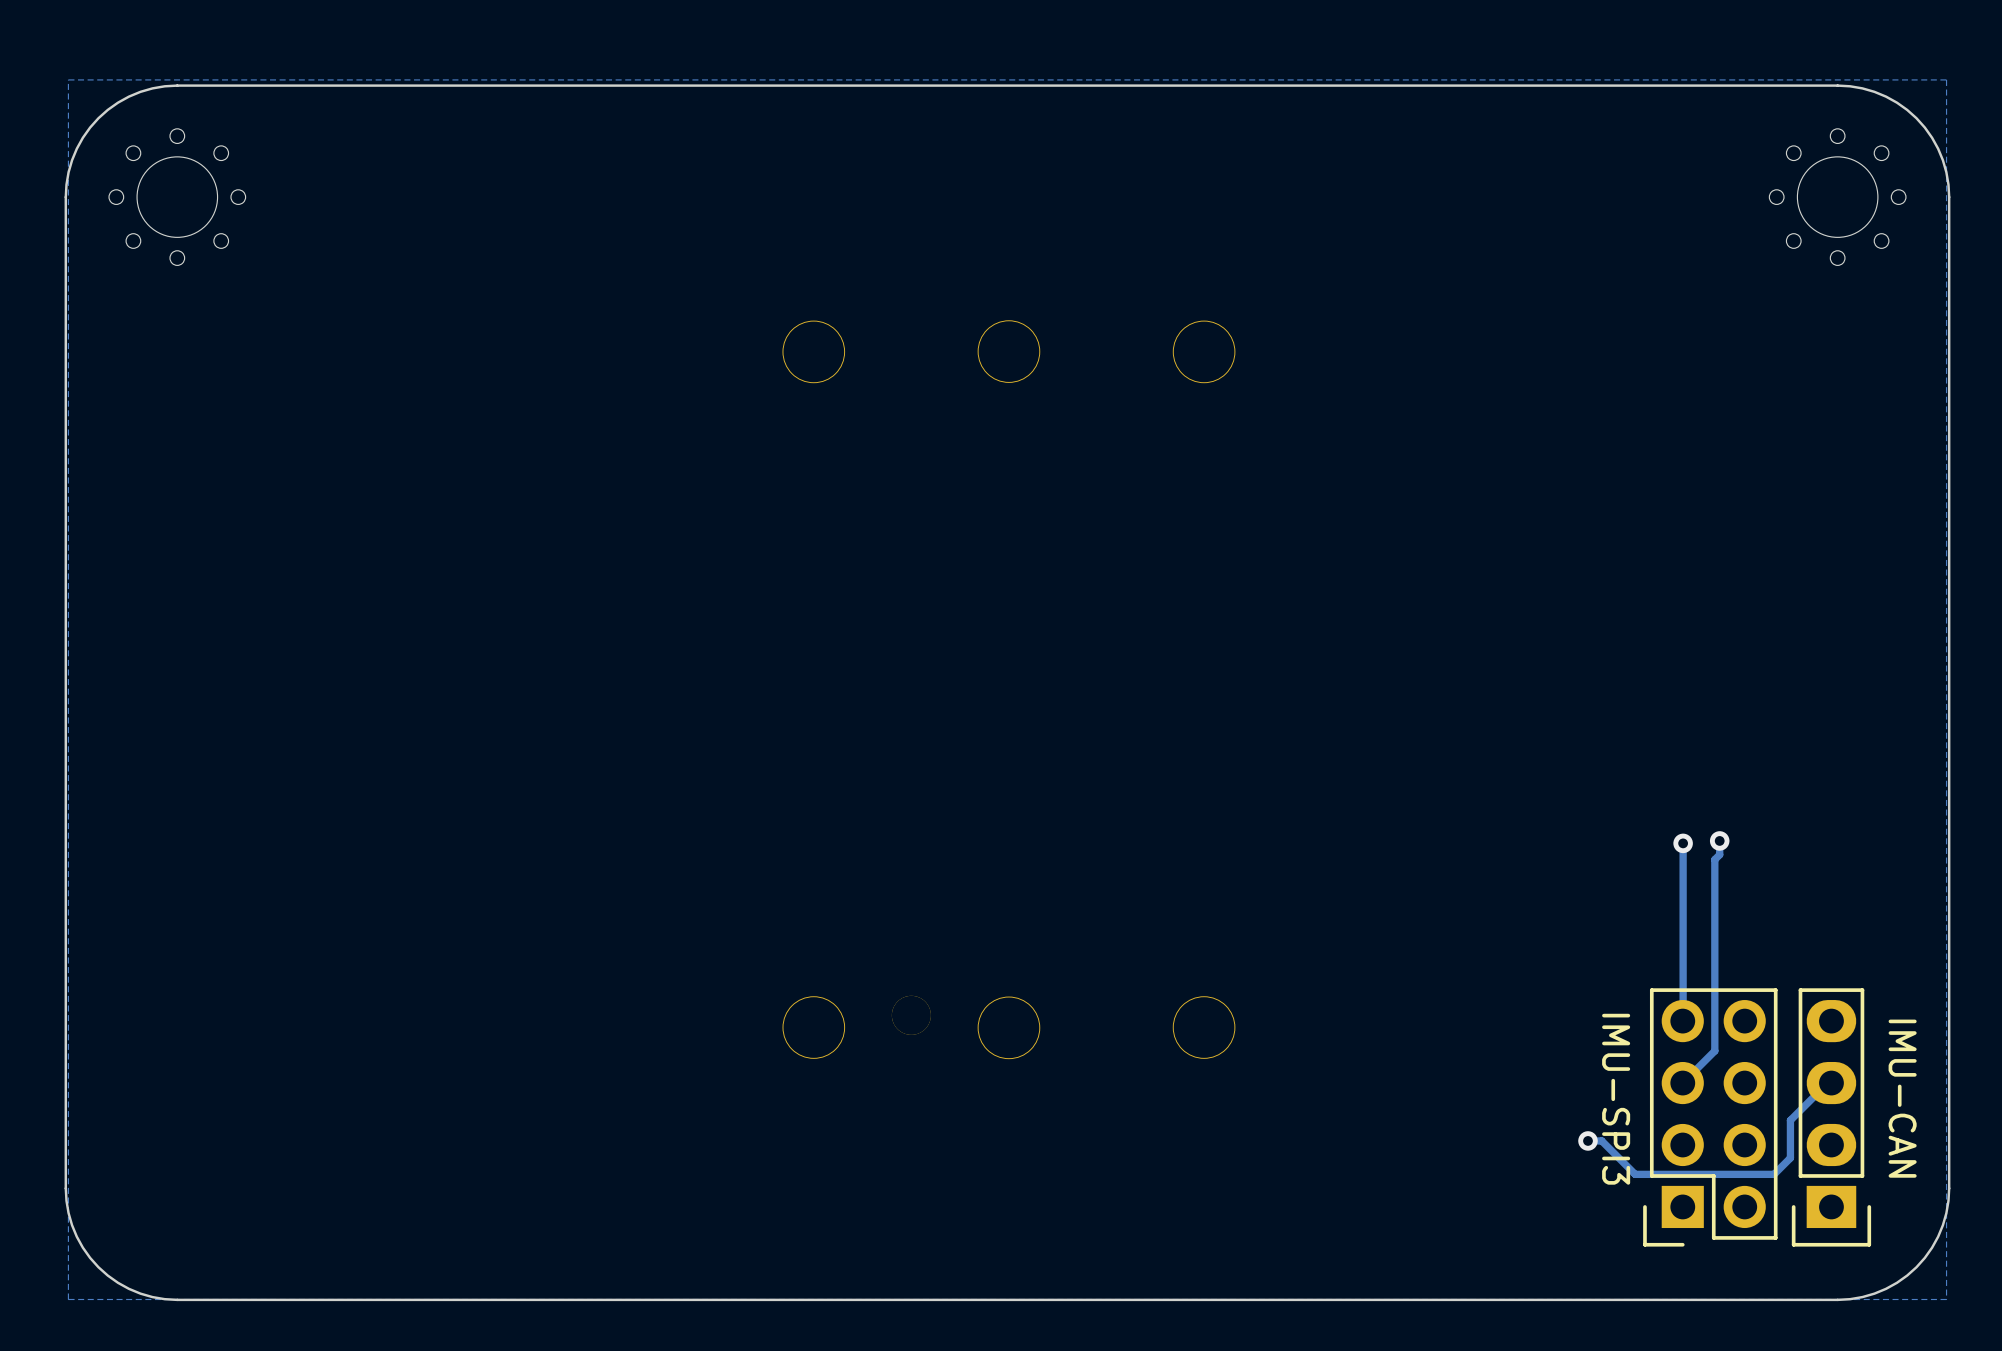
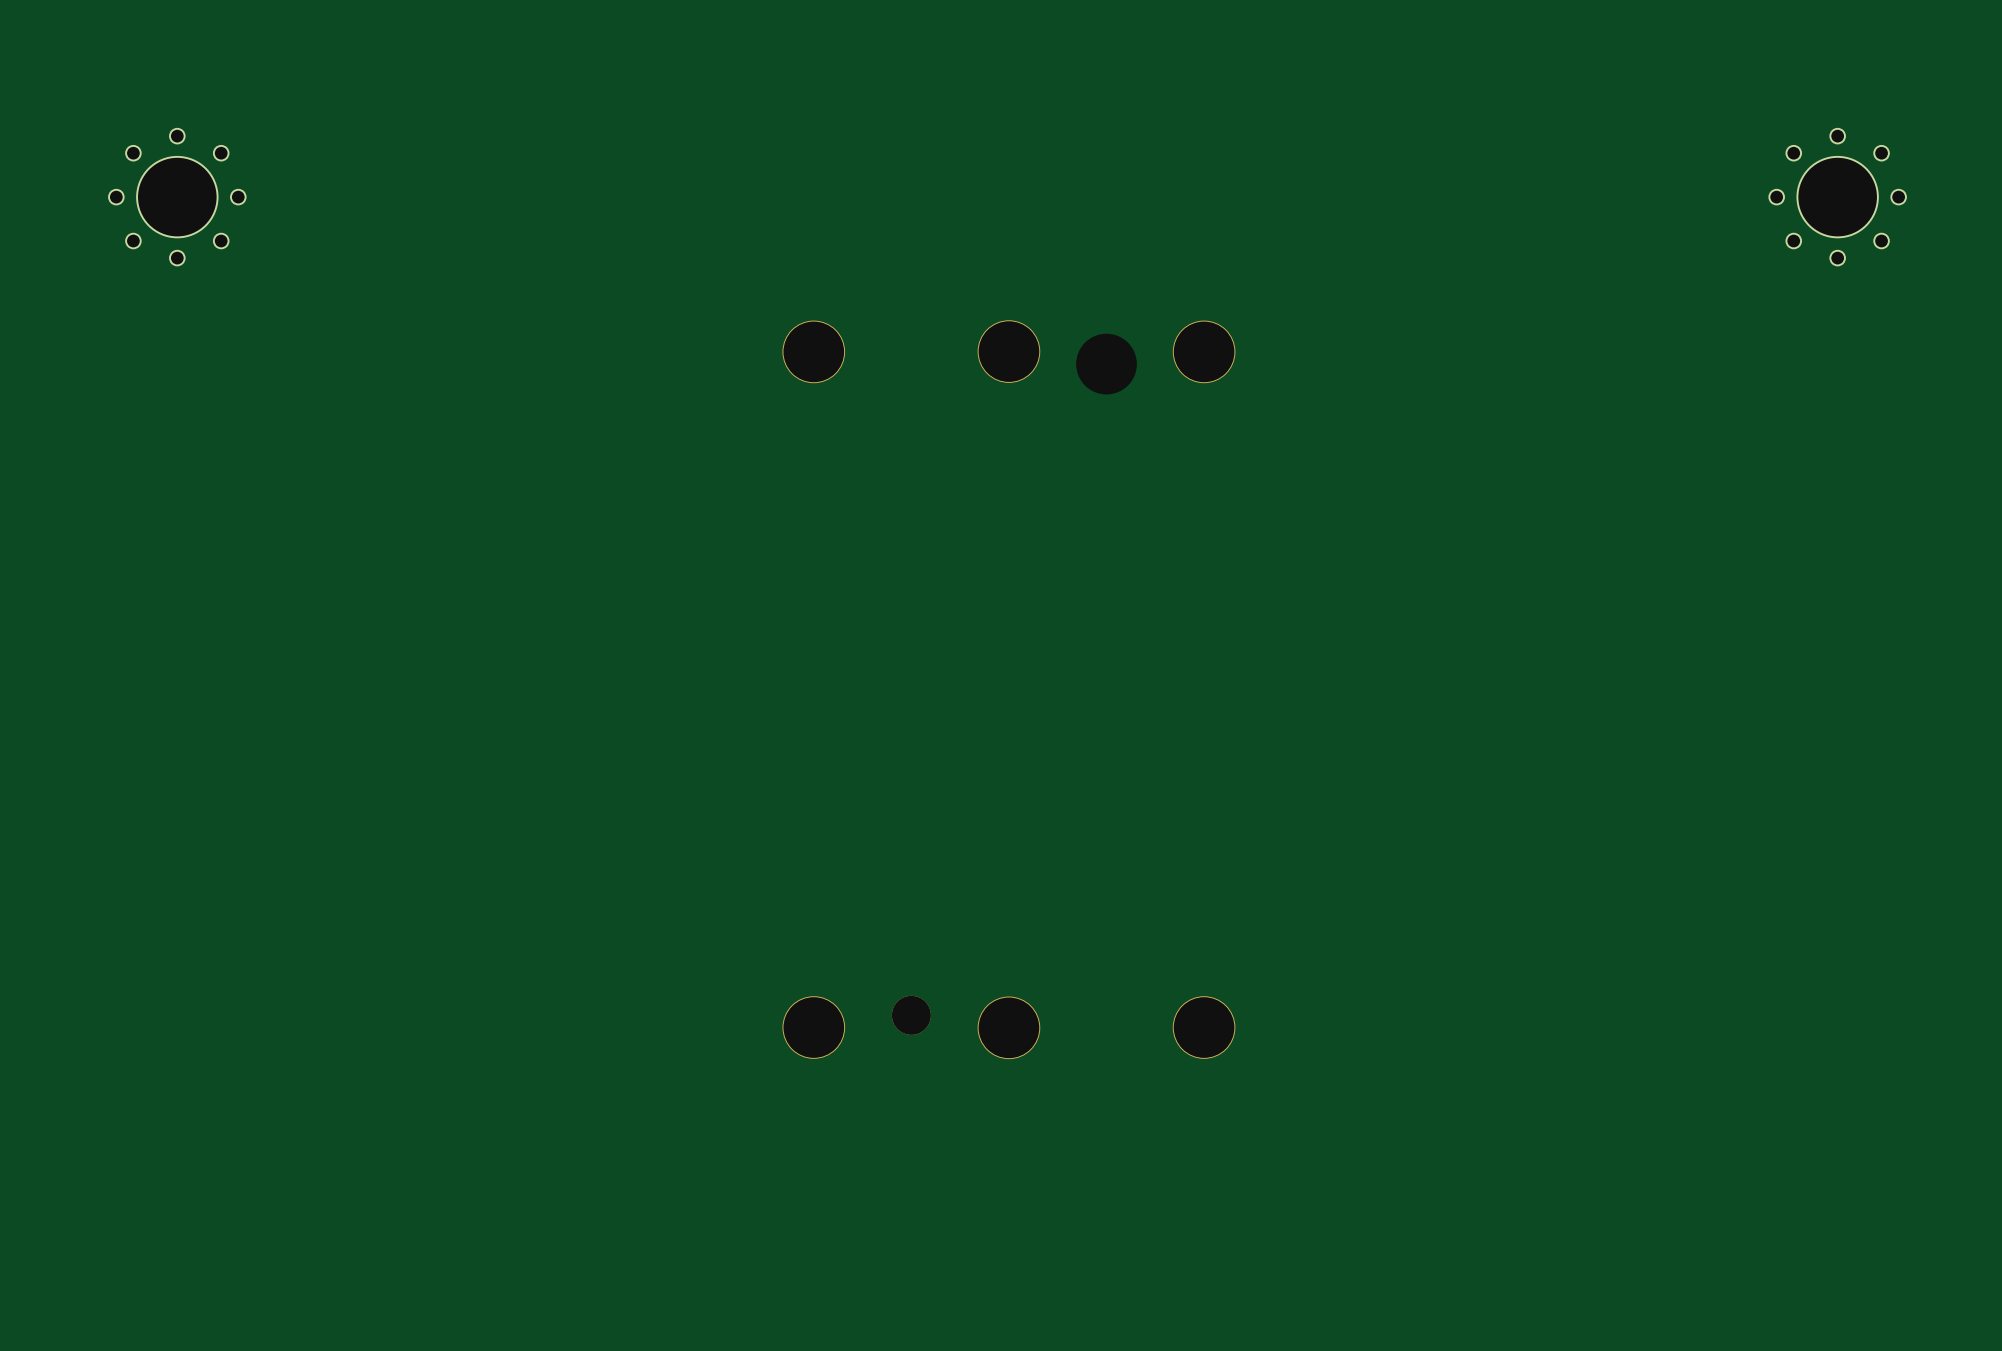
zone outline: (1946, 79) (68, 79) (68, 1299) (1946, 1299) (1946, 79) -> none
board edge: (1837, 85) (177, 85) (152, 88) (117, 102) (90, 127) (76, 148) (68, 172) (65, 197) (65, 1188) (68, 1213) (82, 1247) (107, 1275) (128, 1288) (152, 1297) (177, 1299) (1837, 1299) (1862, 1297) (1896, 1282) (1916, 1267) (1932, 1247) (1942, 1225) (1949, 1188) (1949, 197) (1946, 172) (1938, 148) (1916, 118) (1886, 96) (1862, 88) (1837, 85) -> none
track: (1719, 840) (1719, 854) (1714, 859) (1714, 1050) (1682, 1083) -> none
via: (1719, 840) -> none
track: (1683, 843) (1683, 1020) -> none
via: (1683, 843) -> none
track: (1831, 1083) (1827, 1083) (1790, 1120) (1790, 1158) (1774, 1174) (1635, 1174) (1601, 1140) (1587, 1140) -> none
part: IMU-SPI3 (1710, 1117) -> none
part: IMU-CAN (1831, 1117) -> none
via: (1587, 1140) -> none

